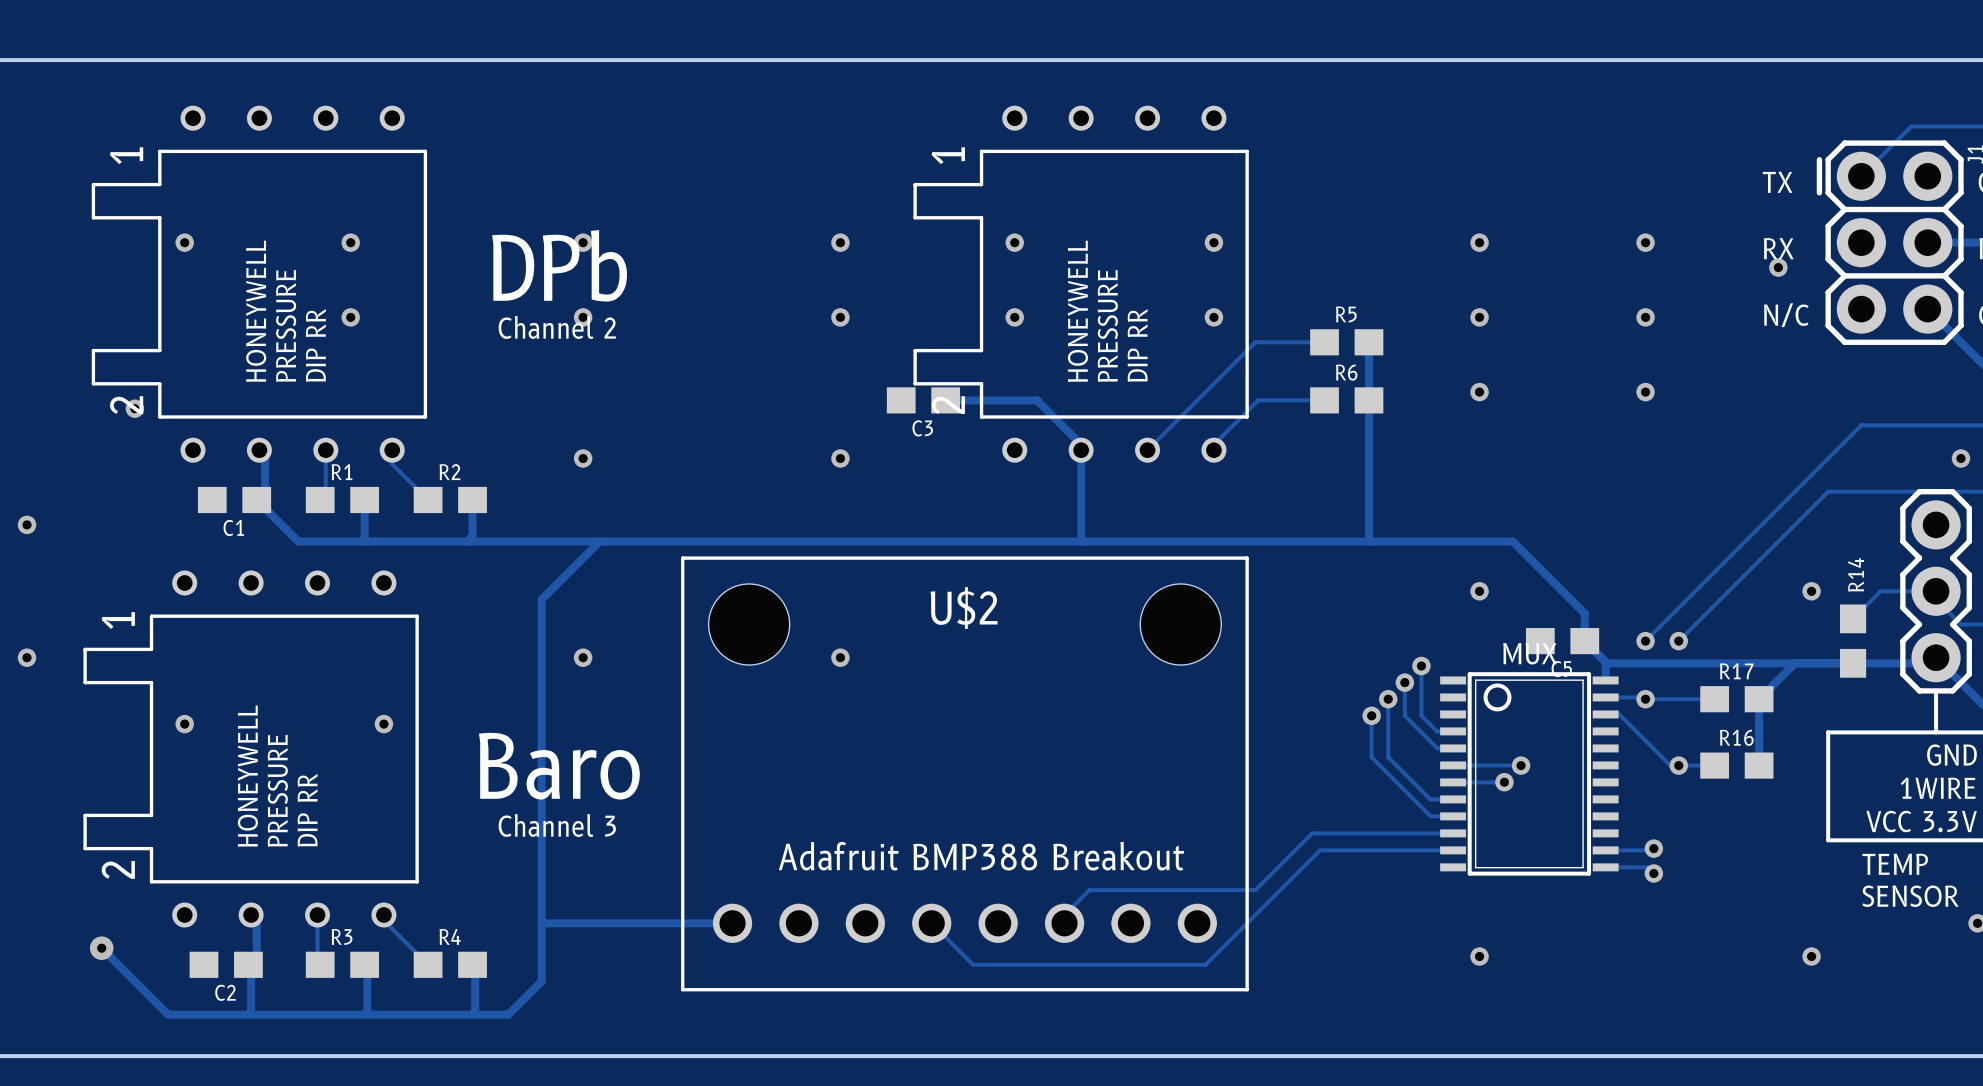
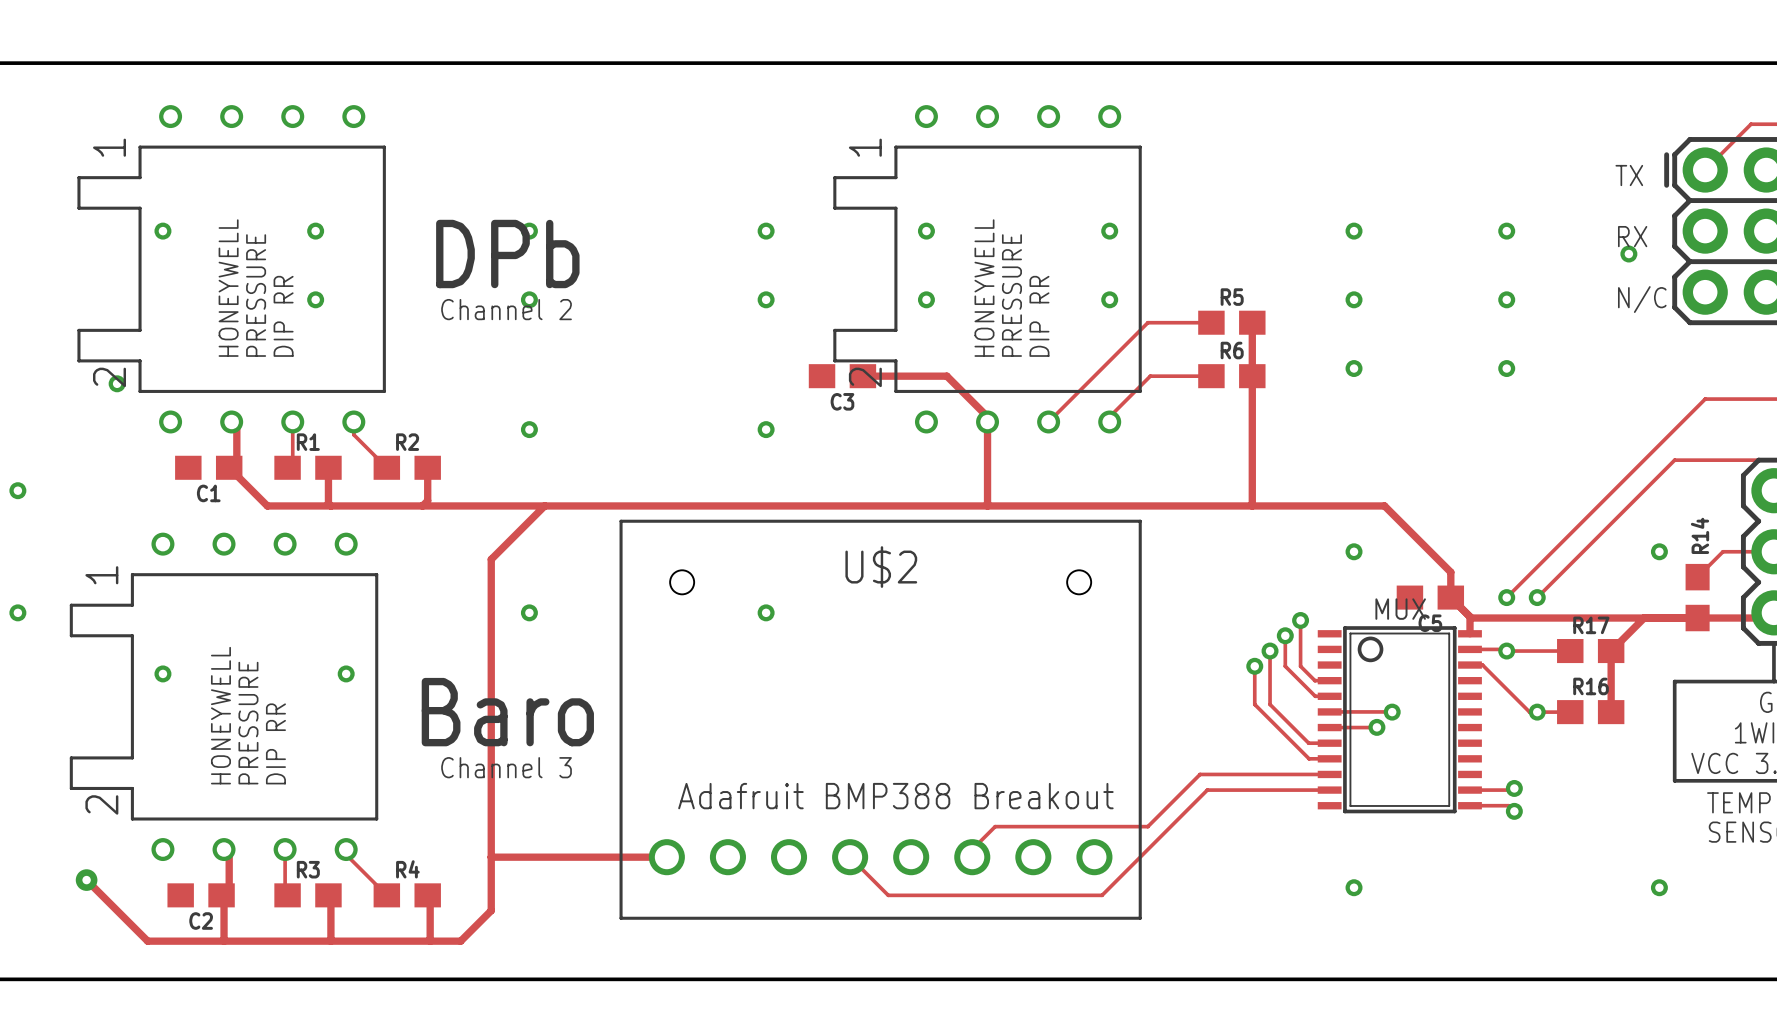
U$2 footprint: [681, 556, 1249, 992] -> [619, 519, 1142, 920]

